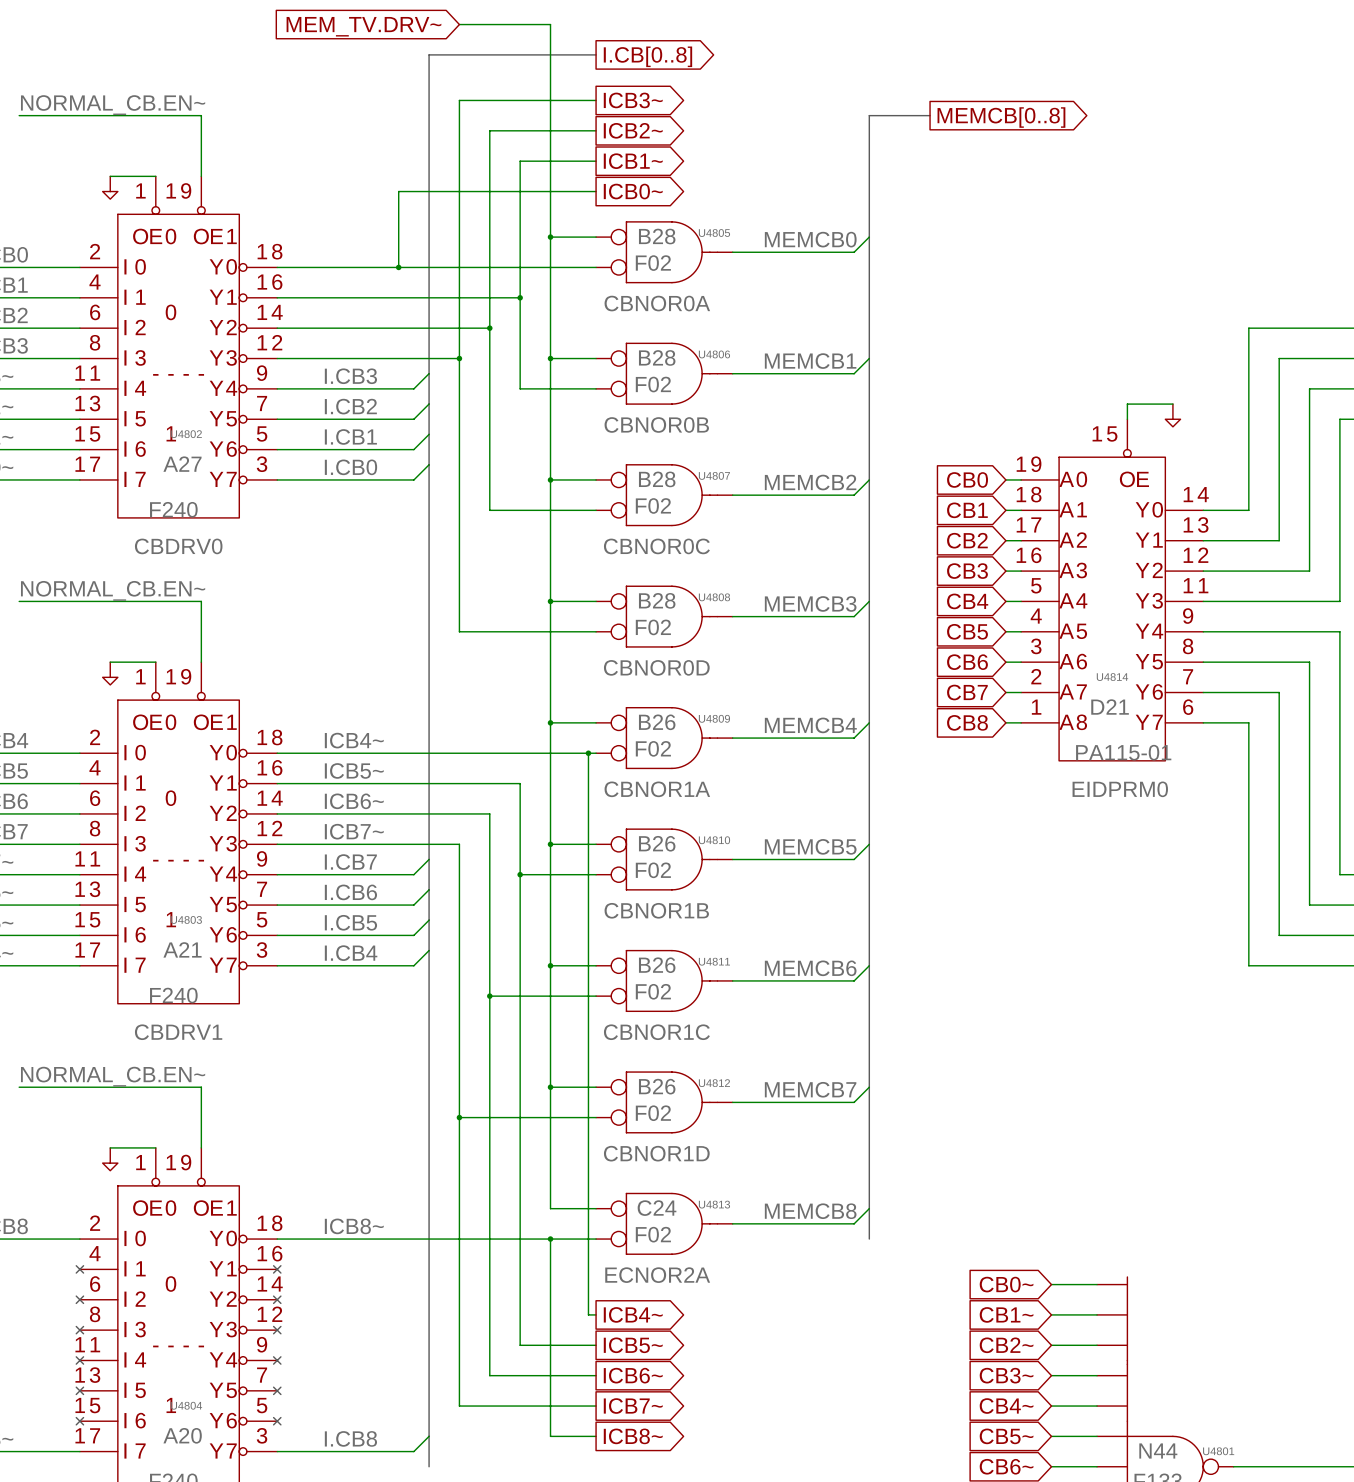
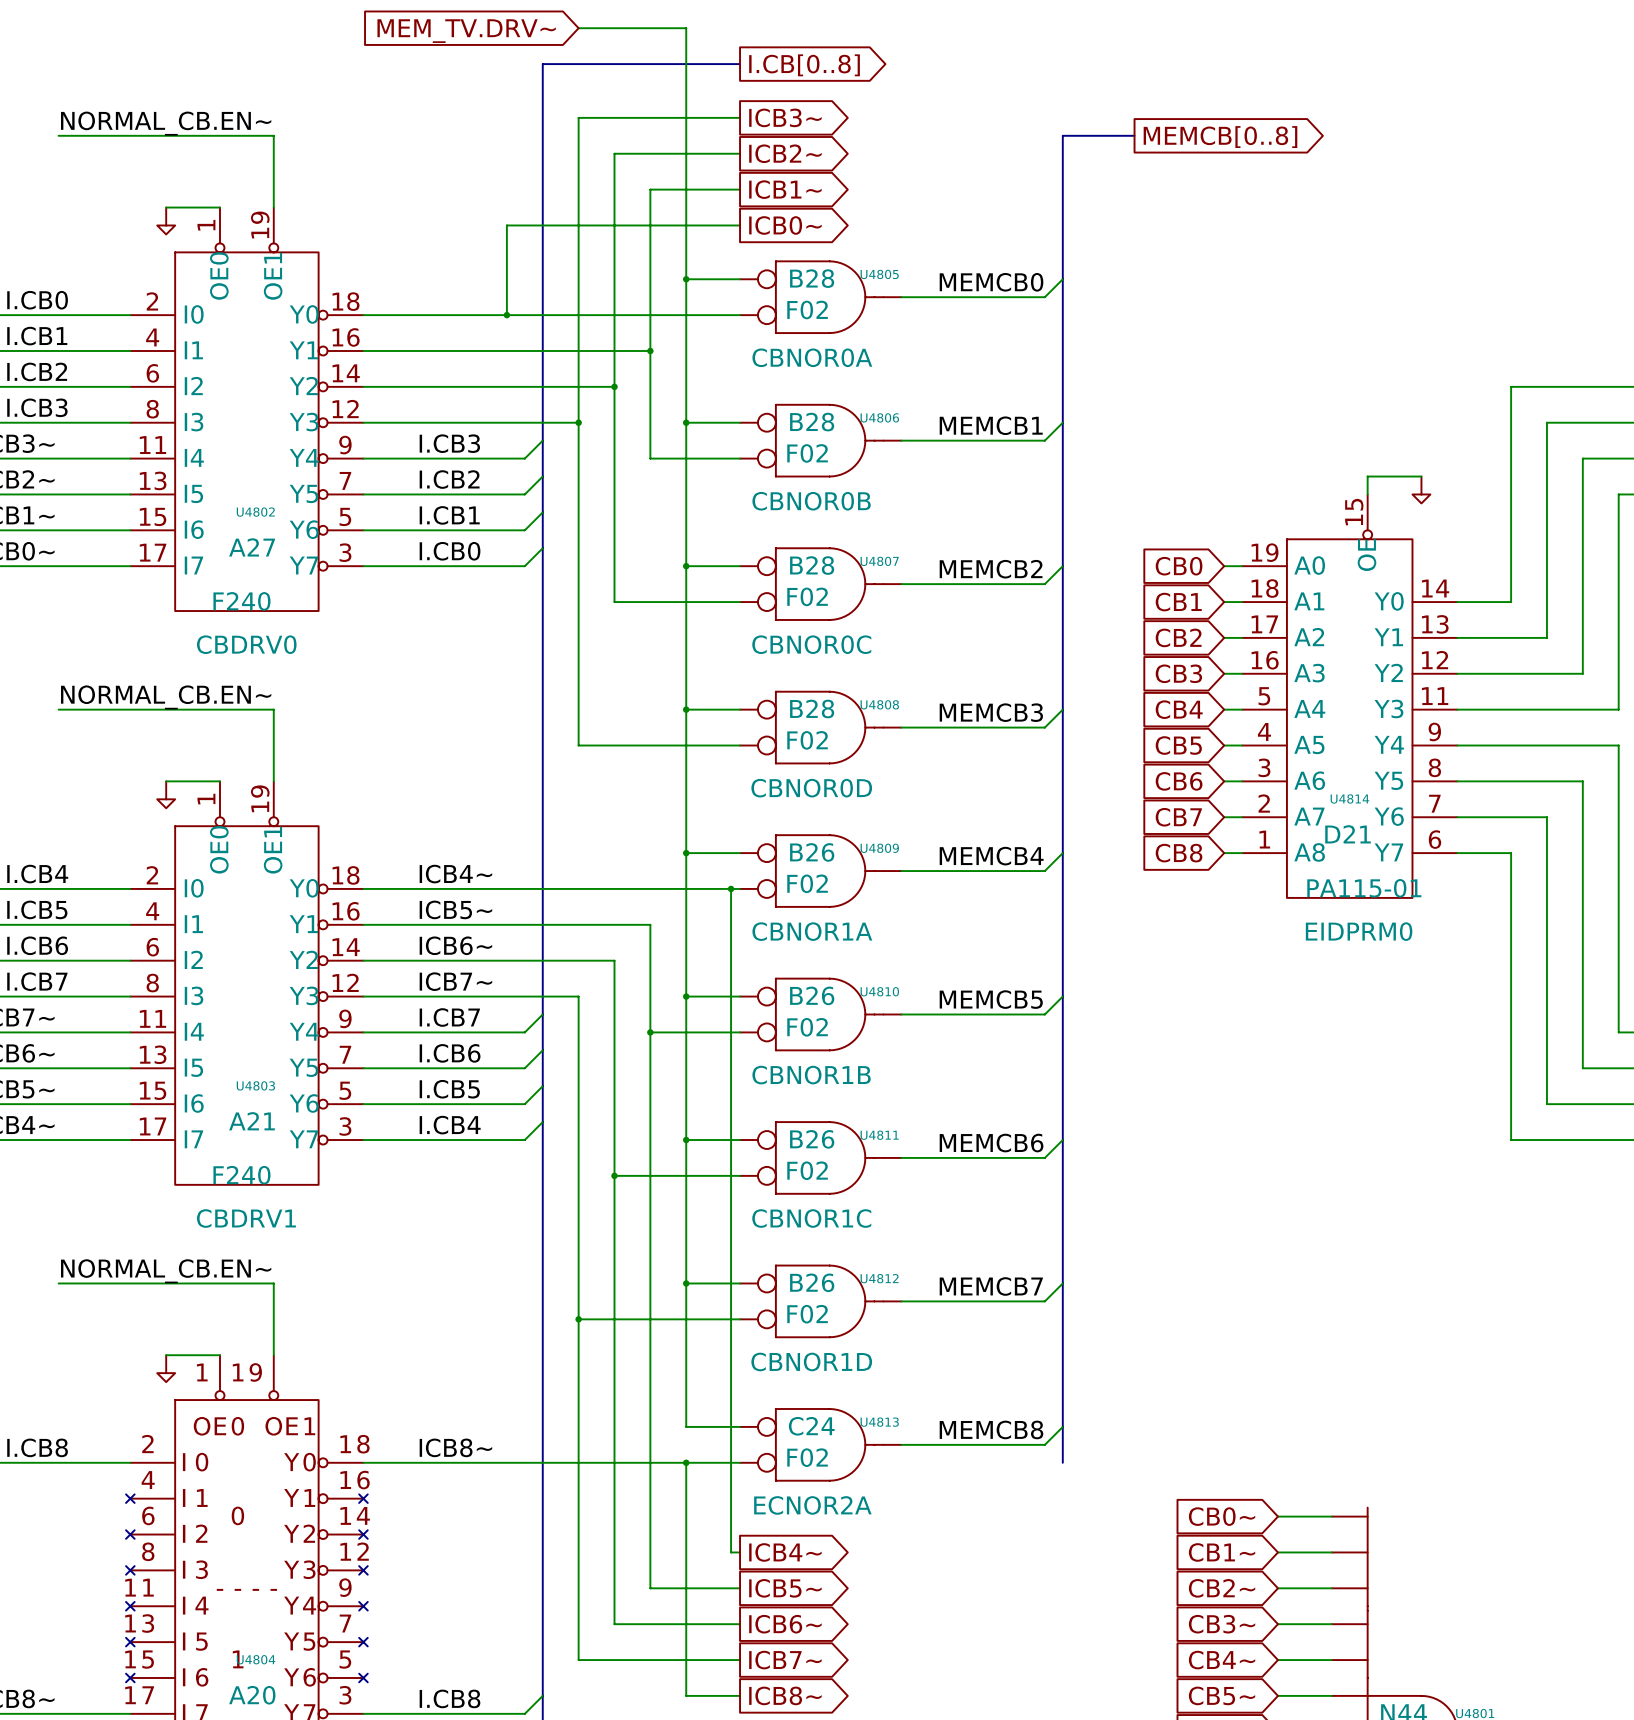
U4802 symbol: [79, 176, 278, 518] -> [130, 207, 364, 612]
U4814 symbol: [1021, 419, 1204, 761] -> [1242, 494, 1458, 898]
U4803 symbol: [79, 662, 278, 1004] -> [130, 781, 364, 1185]

